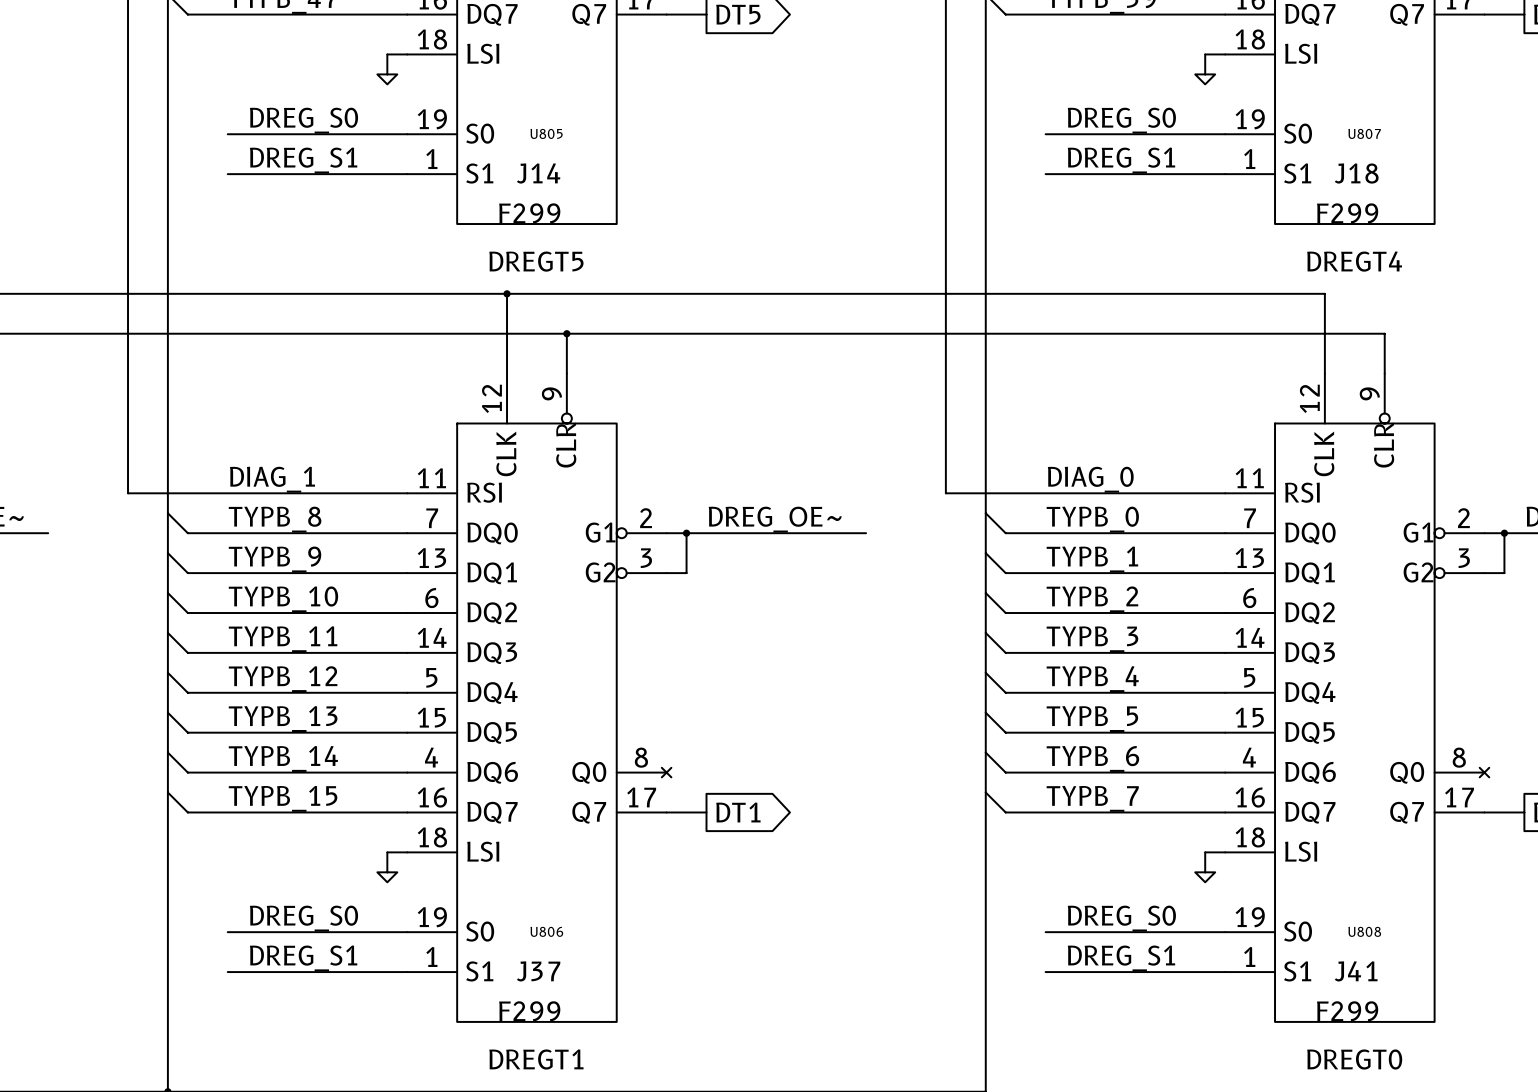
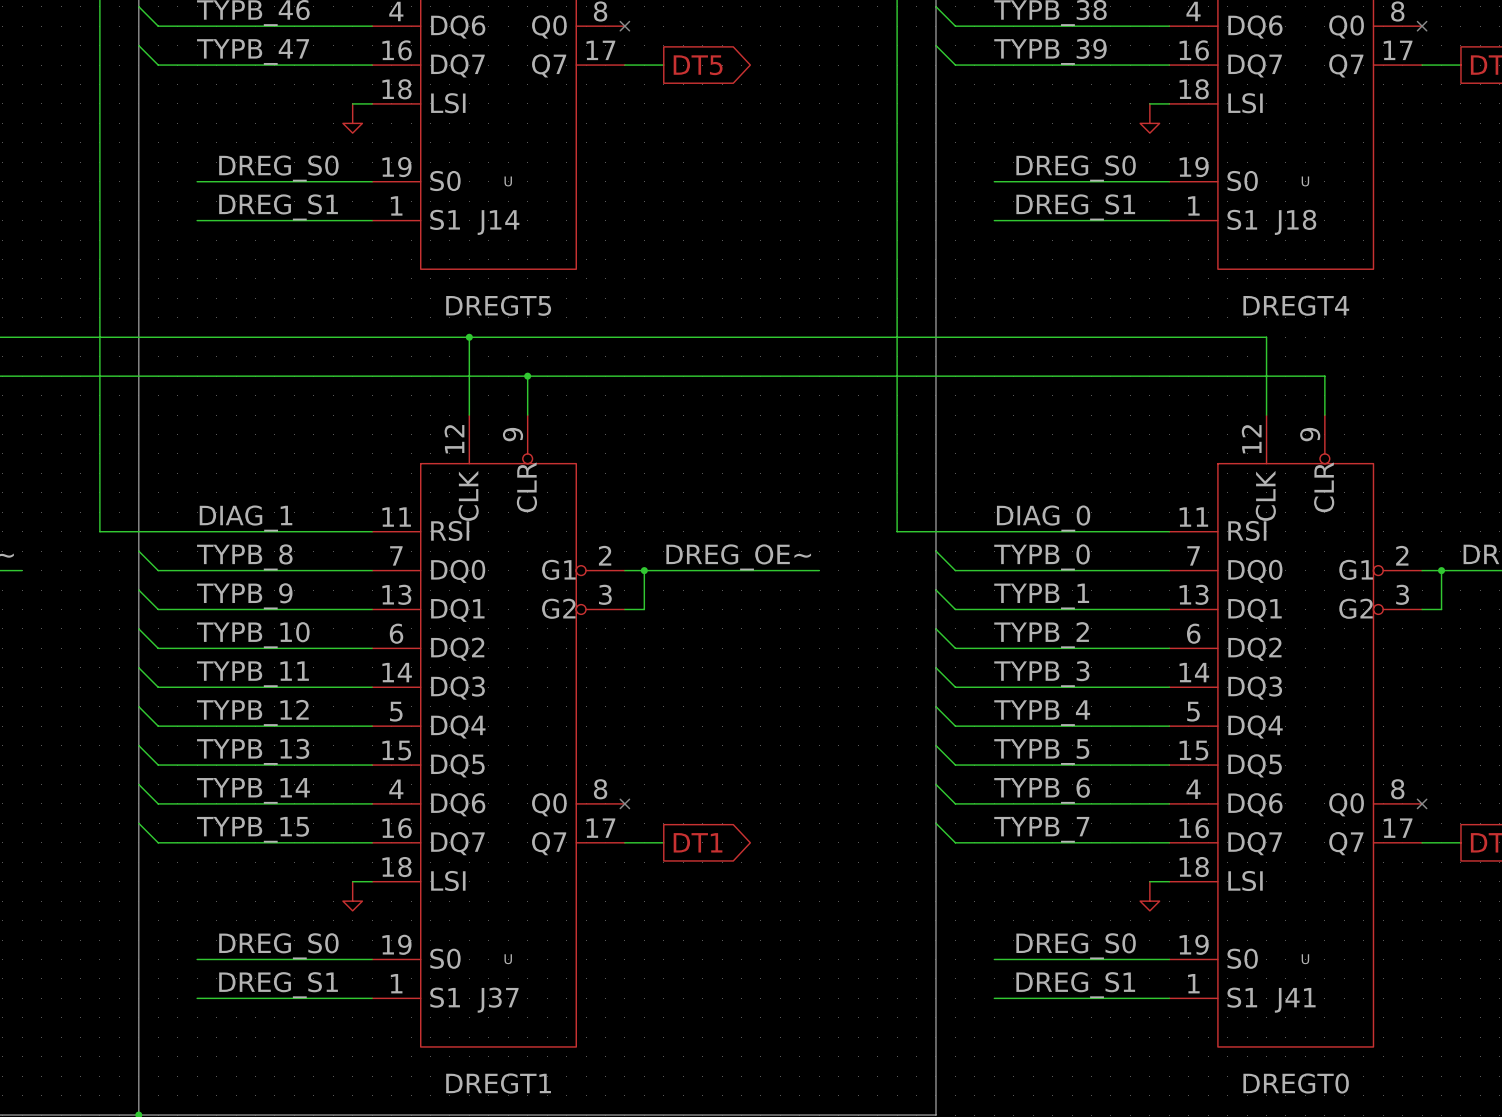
U805 name: U805 (546, 133) -> U (508, 181)
U807 name: U807 (1364, 133) -> U (1305, 181)
U805 value: F299 (529, 213) -> none
U807 value: F299 (1347, 213) -> none
U806 name: U806 (546, 931) -> U (508, 959)
U808 name: U808 (1364, 931) -> U (1305, 959)
U806 value: F299 (529, 1011) -> none
U808 value: F299 (1347, 1011) -> none

